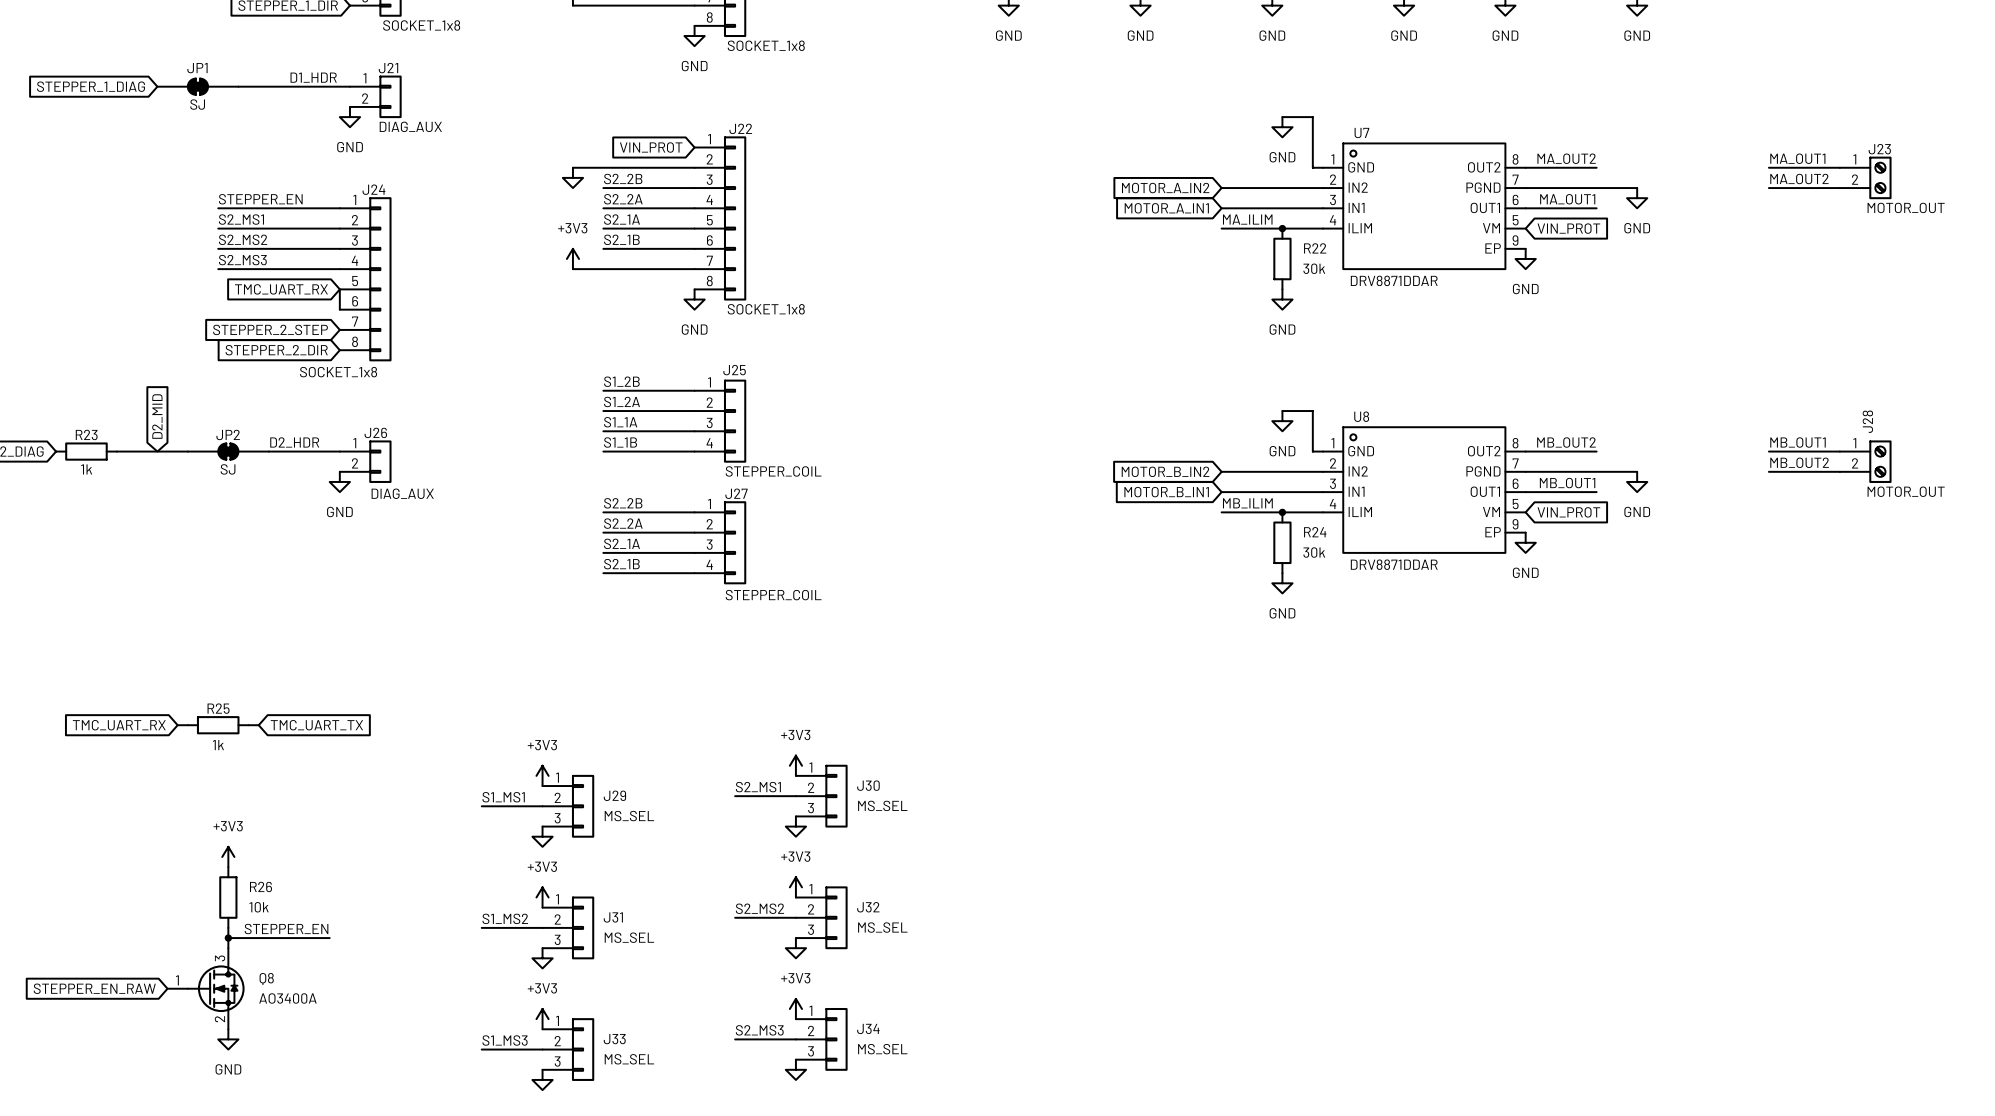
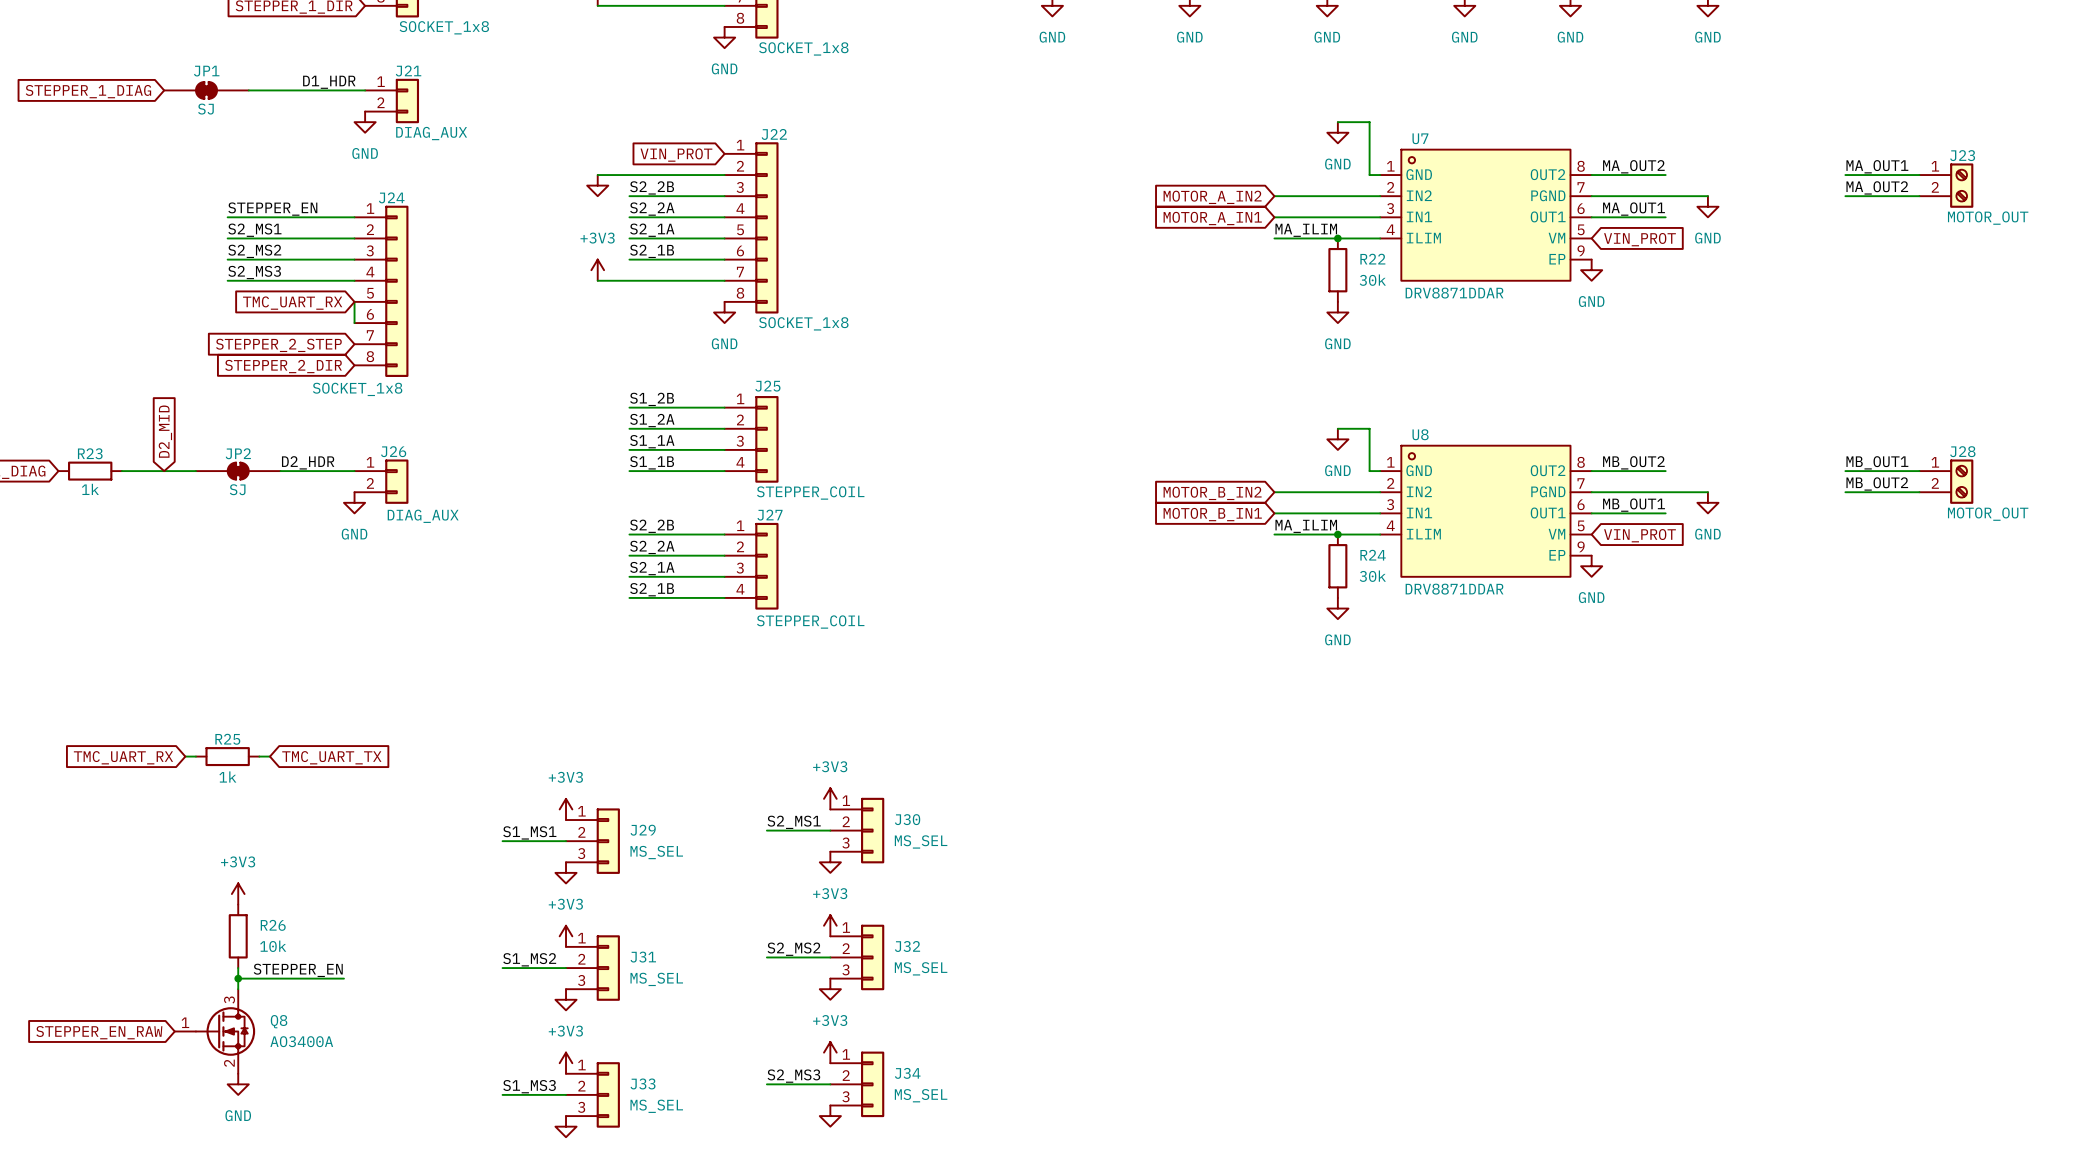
J28 name rotation: 0° (1867, 421) -> 90° clockwise (1962, 451)
label: MB_ILIM (1247, 503) -> MA_ILIM (1306, 526)

